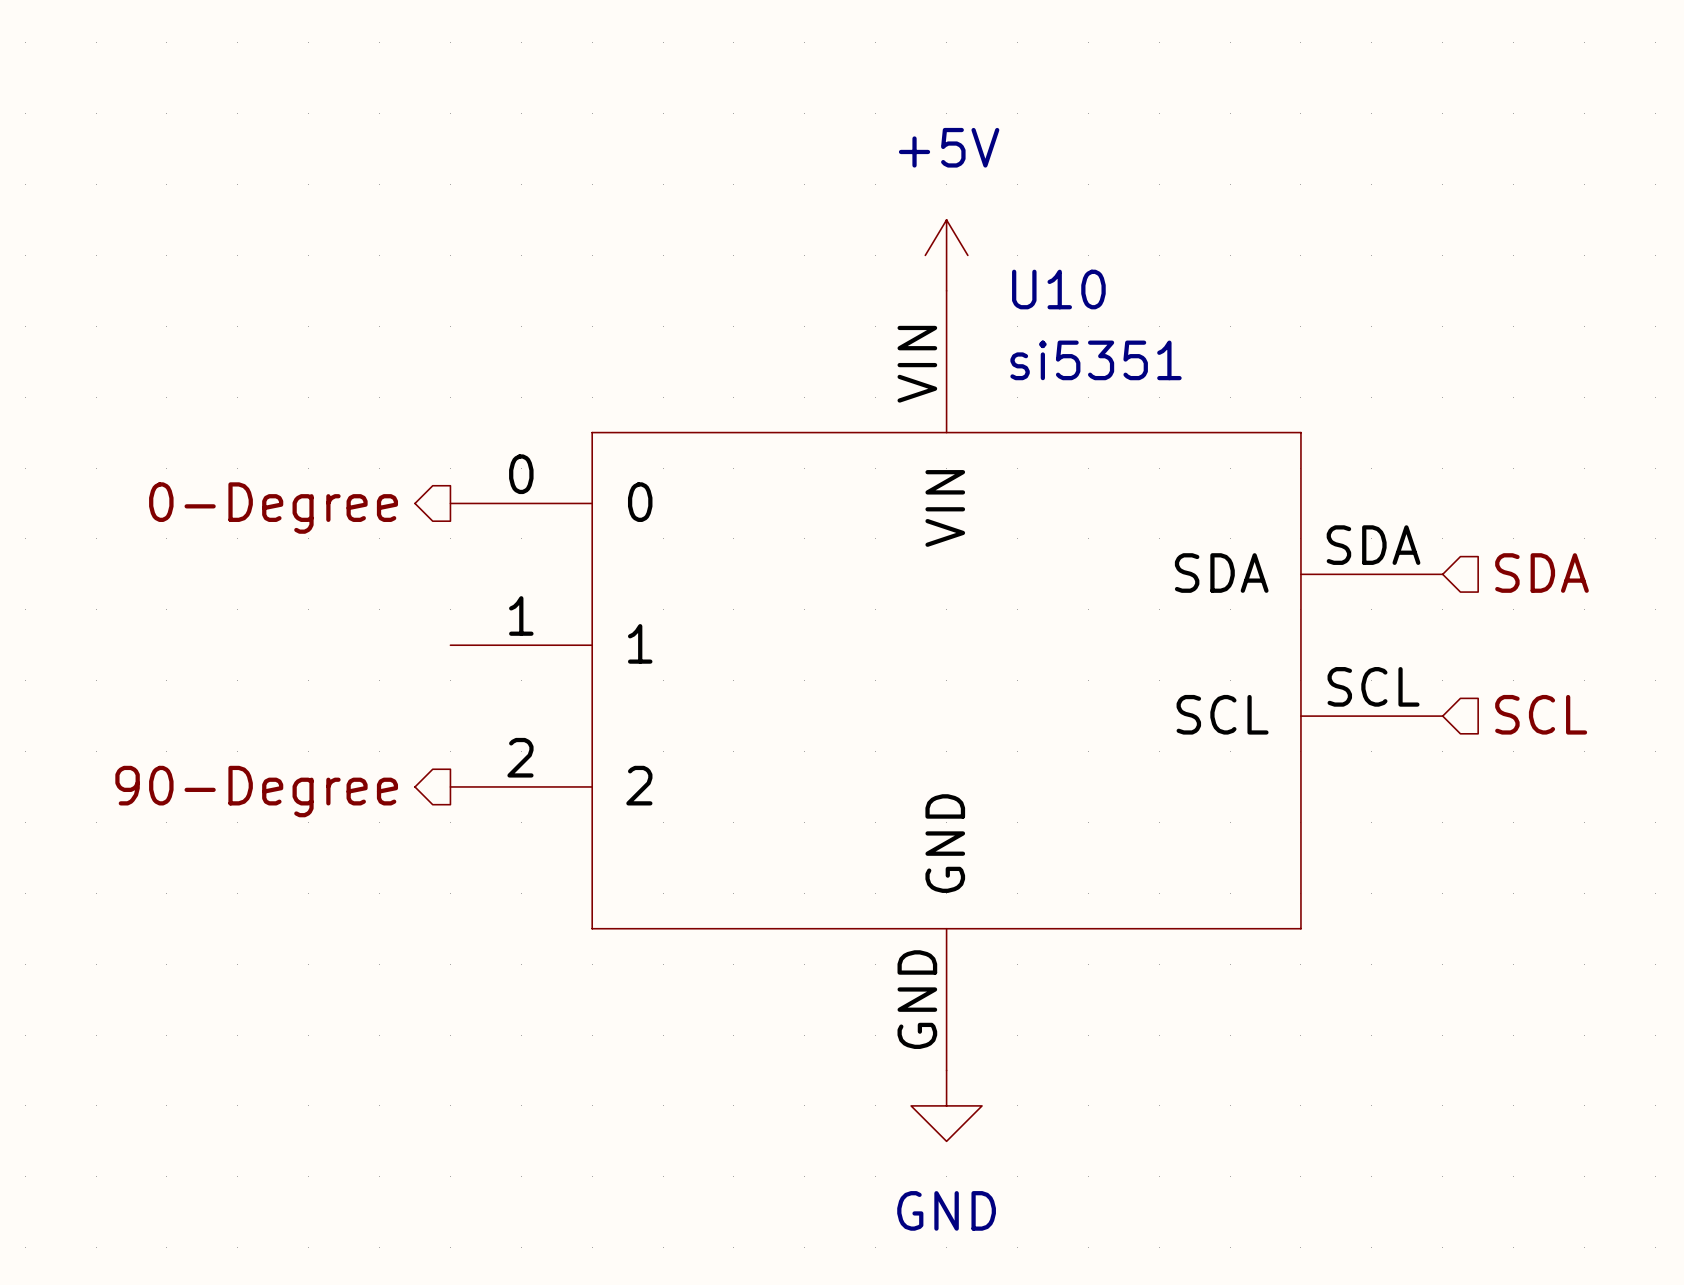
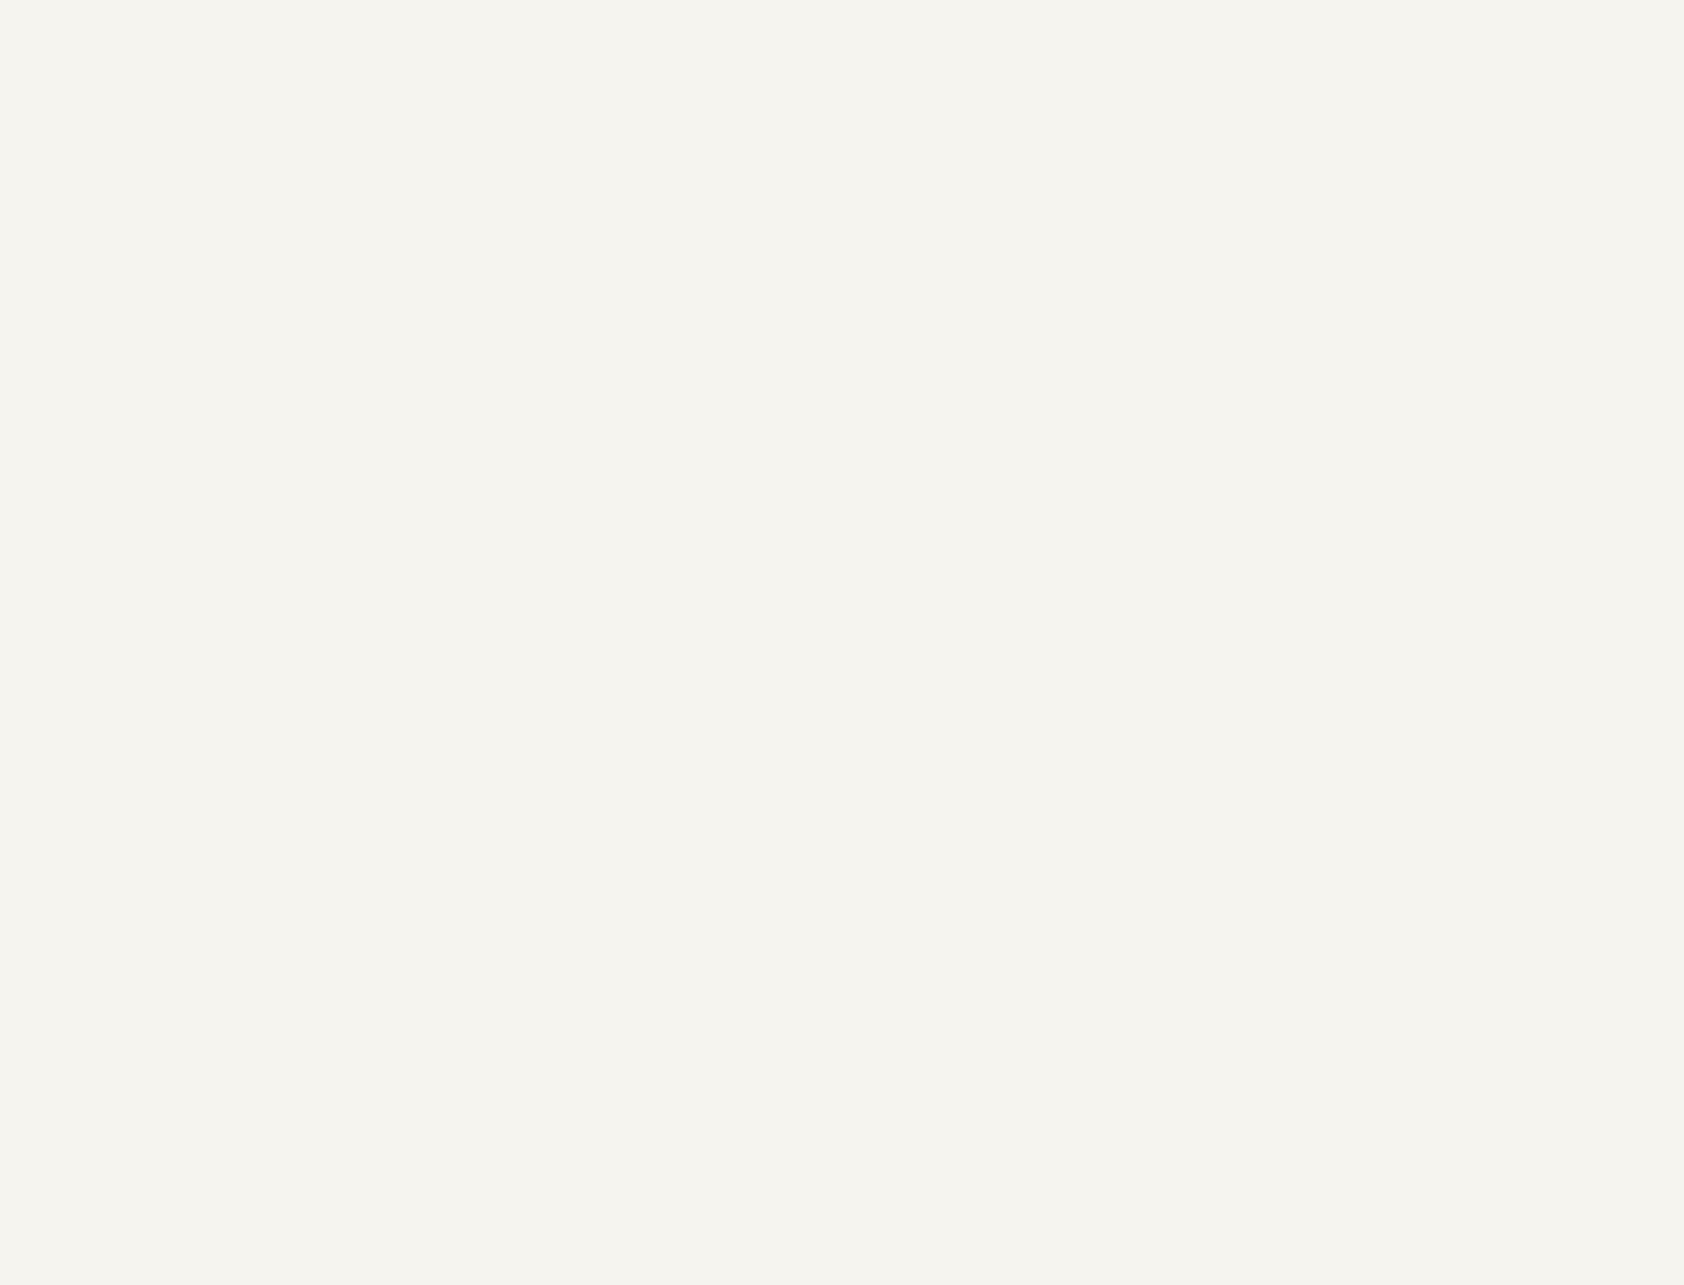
power symbol: +5V (946, 255) -> none
hierarchical label: 0-Degree (273, 508) -> none
hierarchical label: SDA (1541, 573) -> none
U10: si5351 (946, 680) -> none
hierarchical label: SCL (1541, 714) -> none
hierarchical label: 90-Degree (256, 791) -> none
power symbol: GND (946, 1105) -> none

